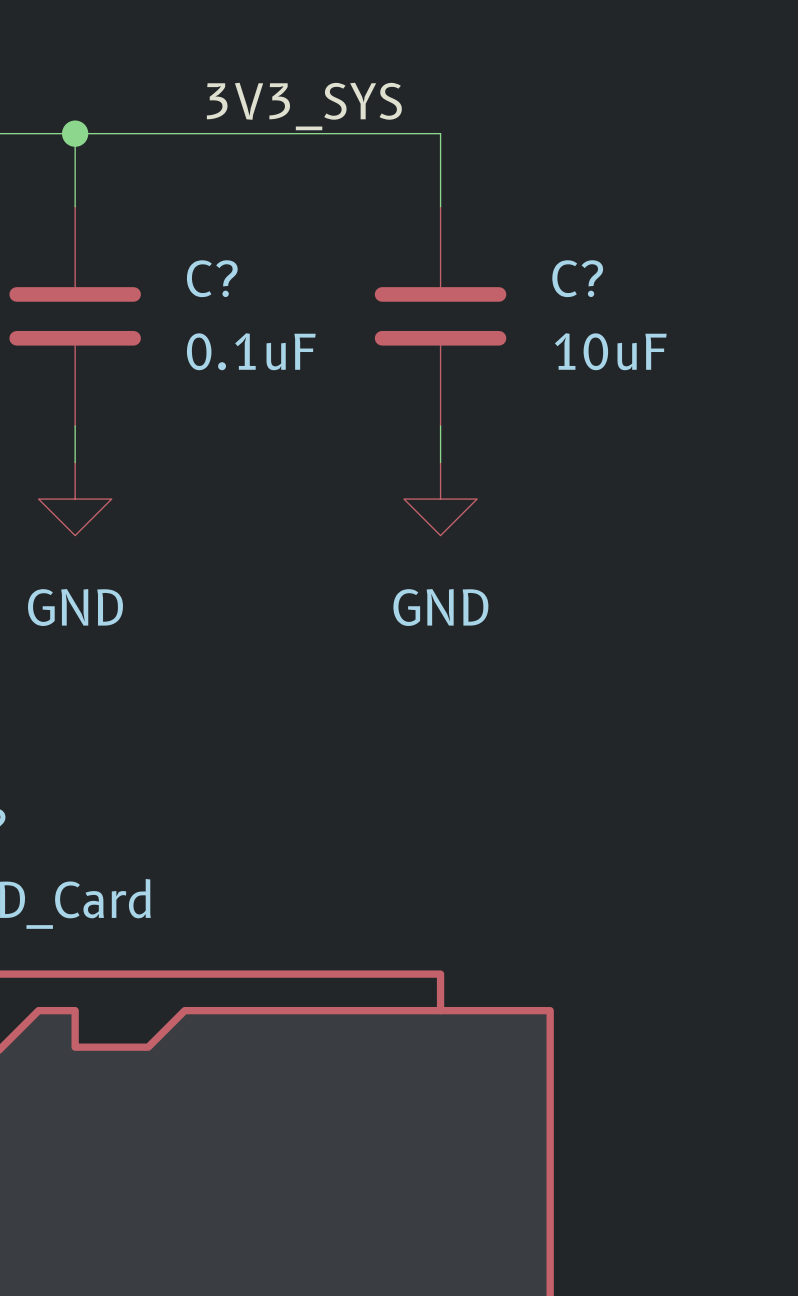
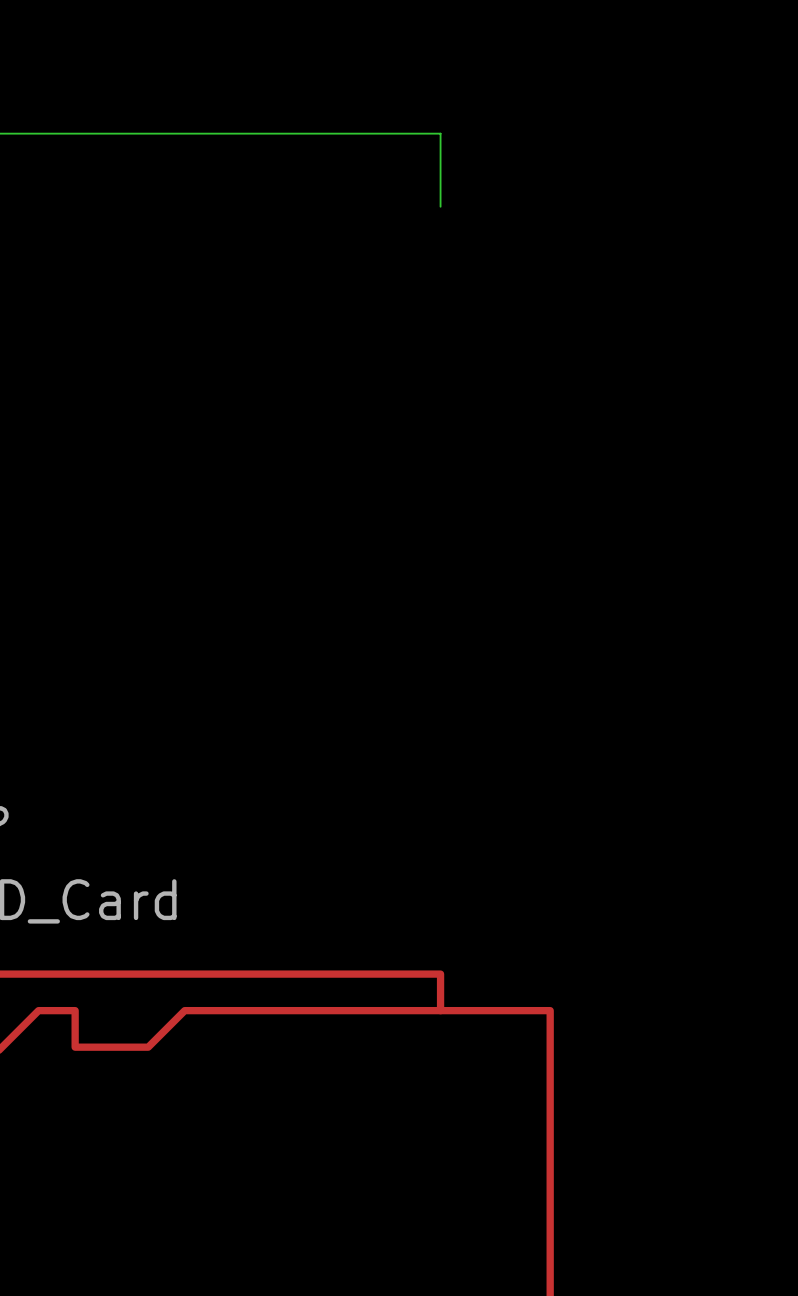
label: 3V3_SYS (304, 106) -> none
wire: (75, 133) (75, 206) -> none
junction: (75, 133) -> none
C?: 0.1uF (75, 316) -> none
C?: 10uF (440, 316) -> none
wire: (75, 425) (75, 462) -> none
wire: (440, 425) (440, 462) -> none
power symbol: GND (75, 499) -> none
power symbol: GND (440, 499) -> none

